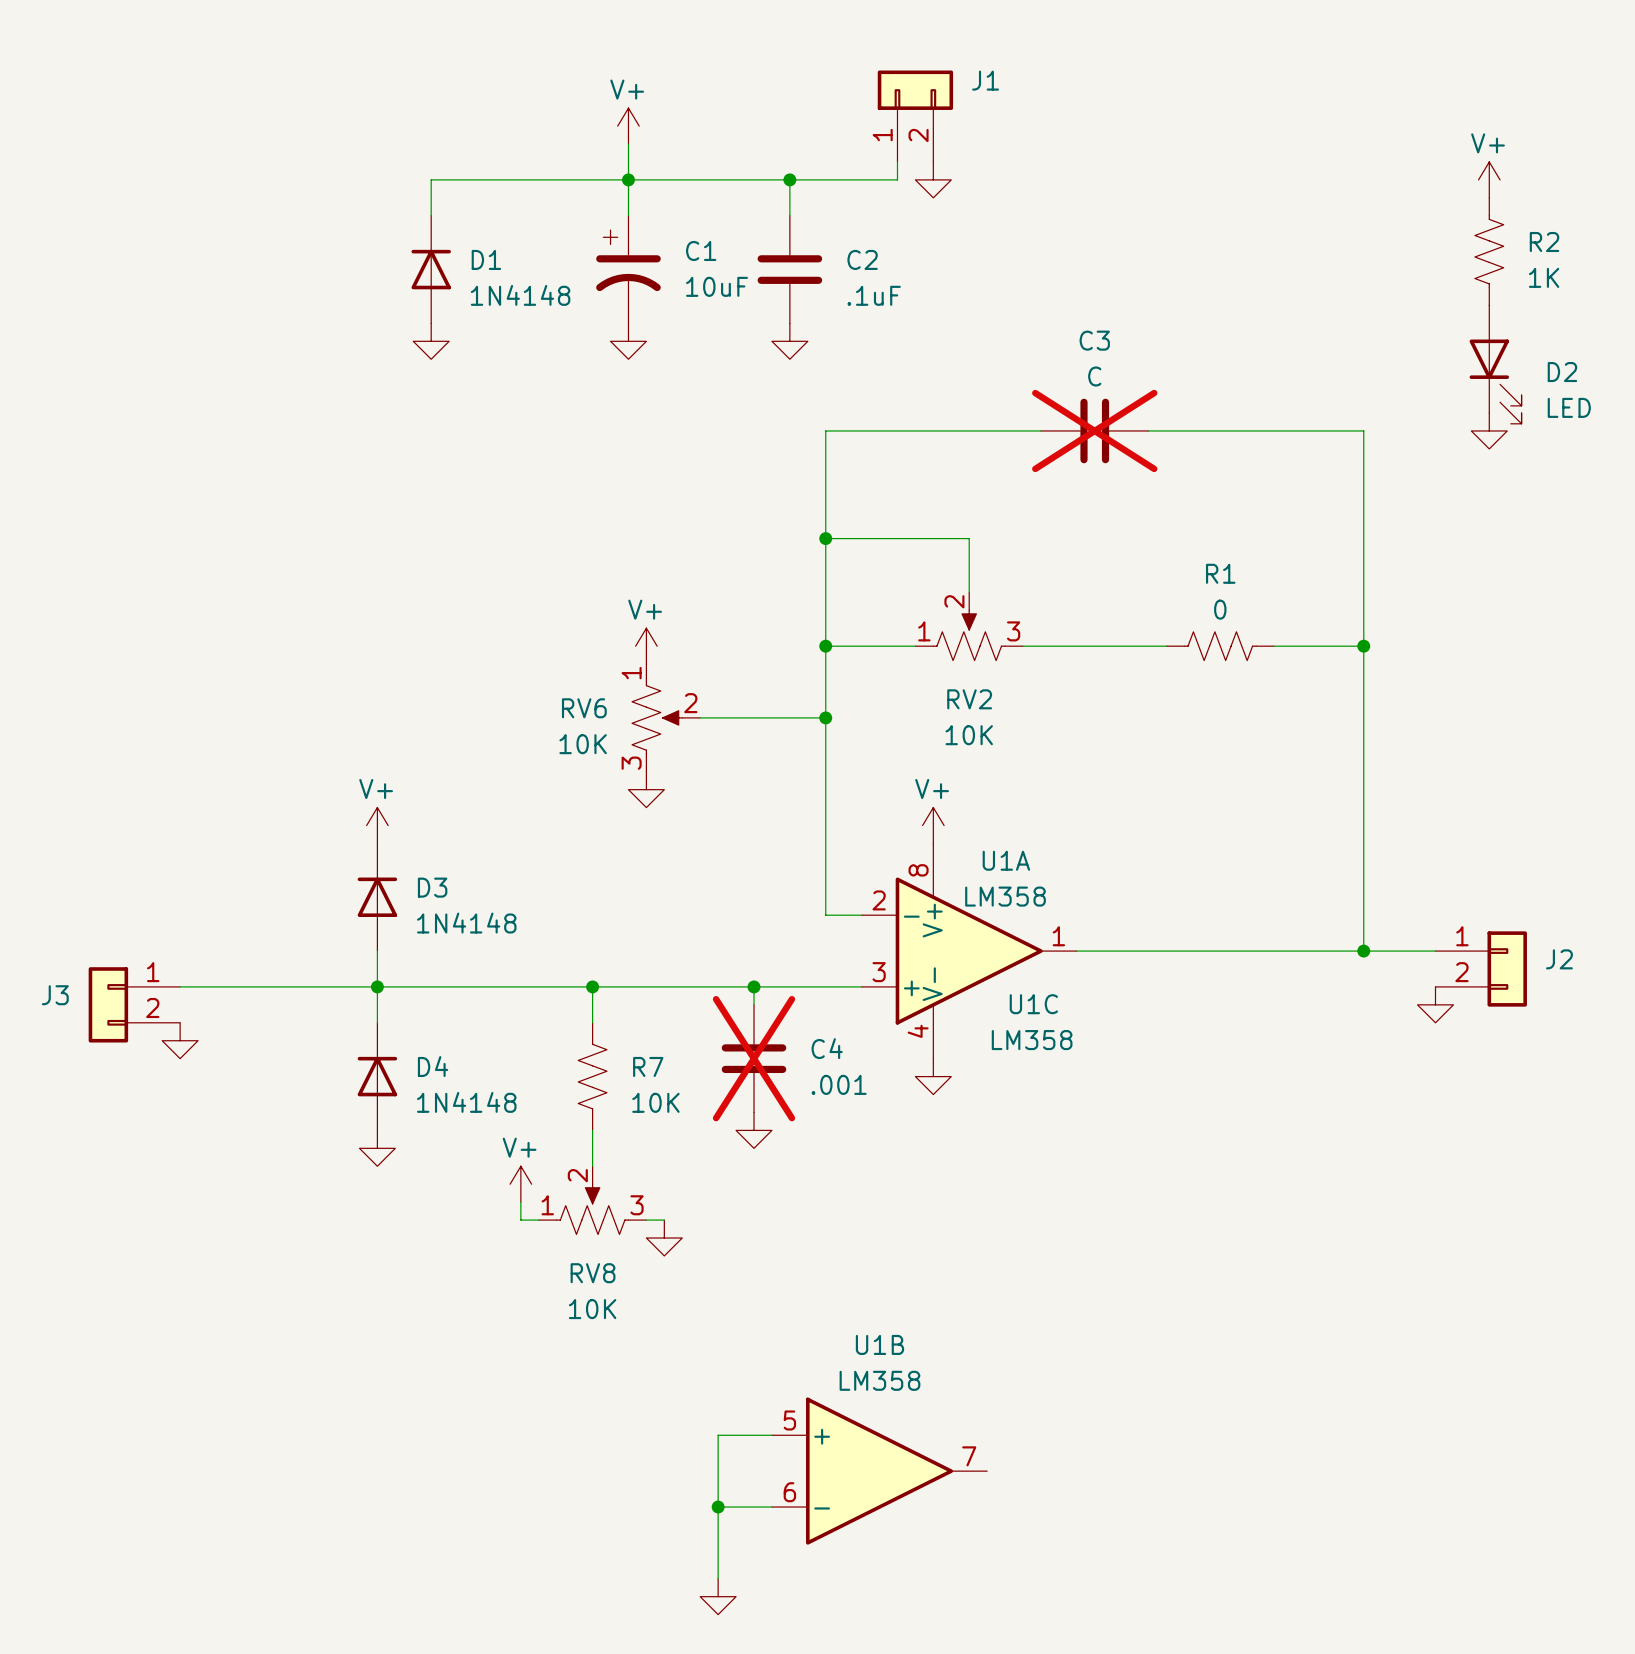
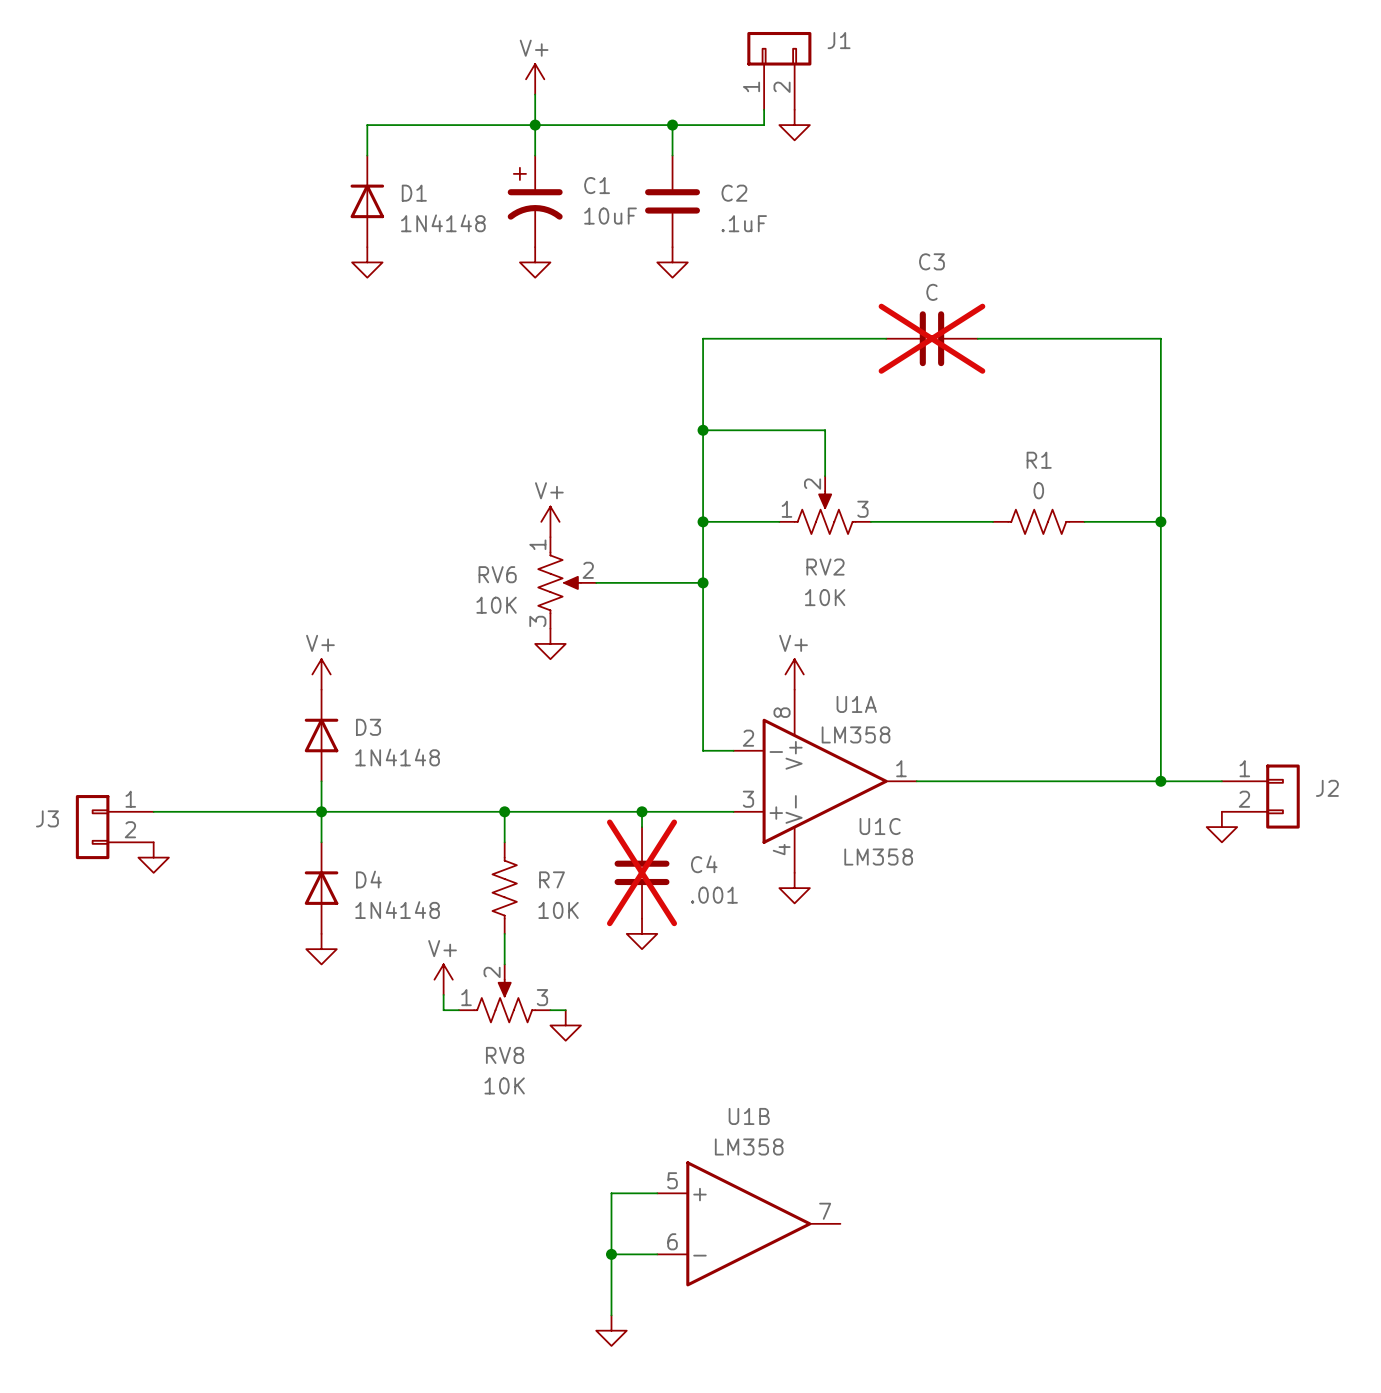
power symbol: V+ (1489, 179) -> none
R2: 1K (1489, 251) -> none
D2: LED (1495, 364) -> none
power symbol: (1489, 430) -> none

